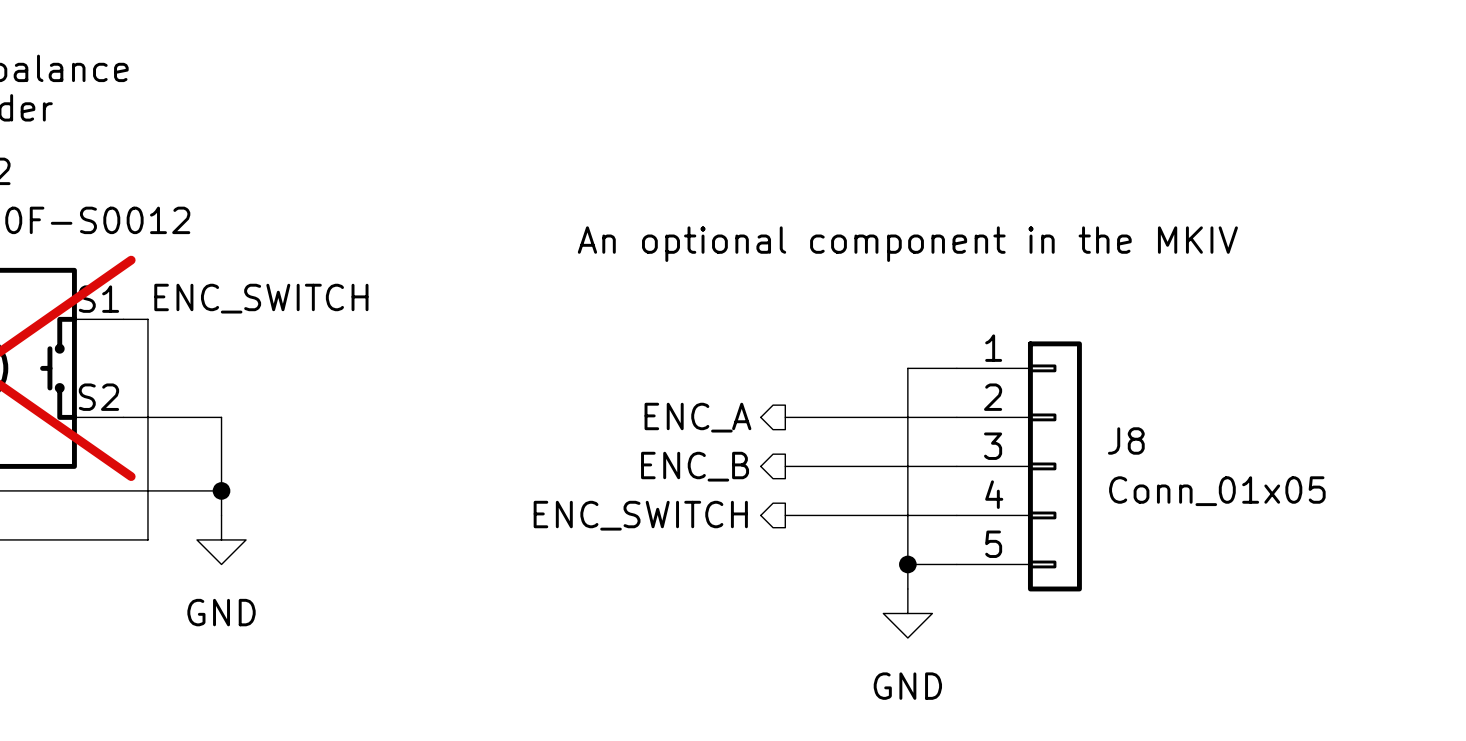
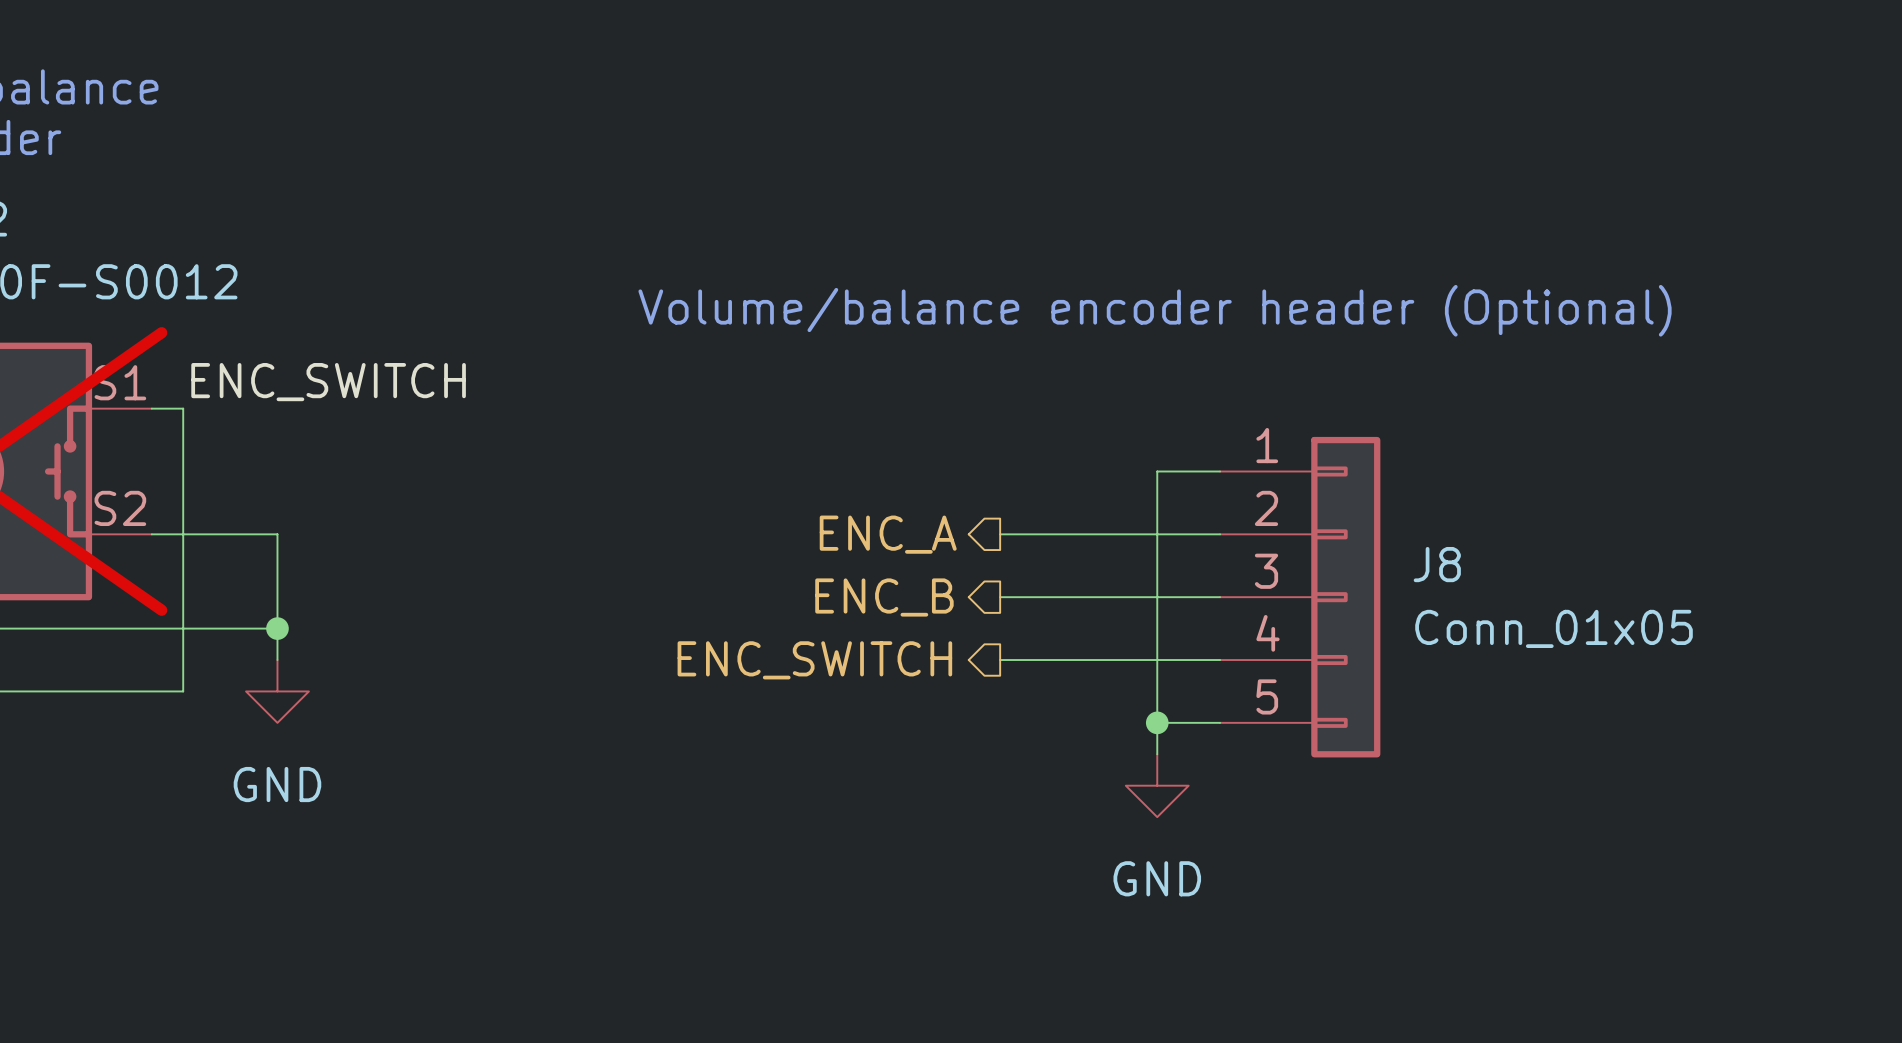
text: An optional component in the MKIV (907, 244) -> Volume/balance encoder header (Optional) (1155, 310)

